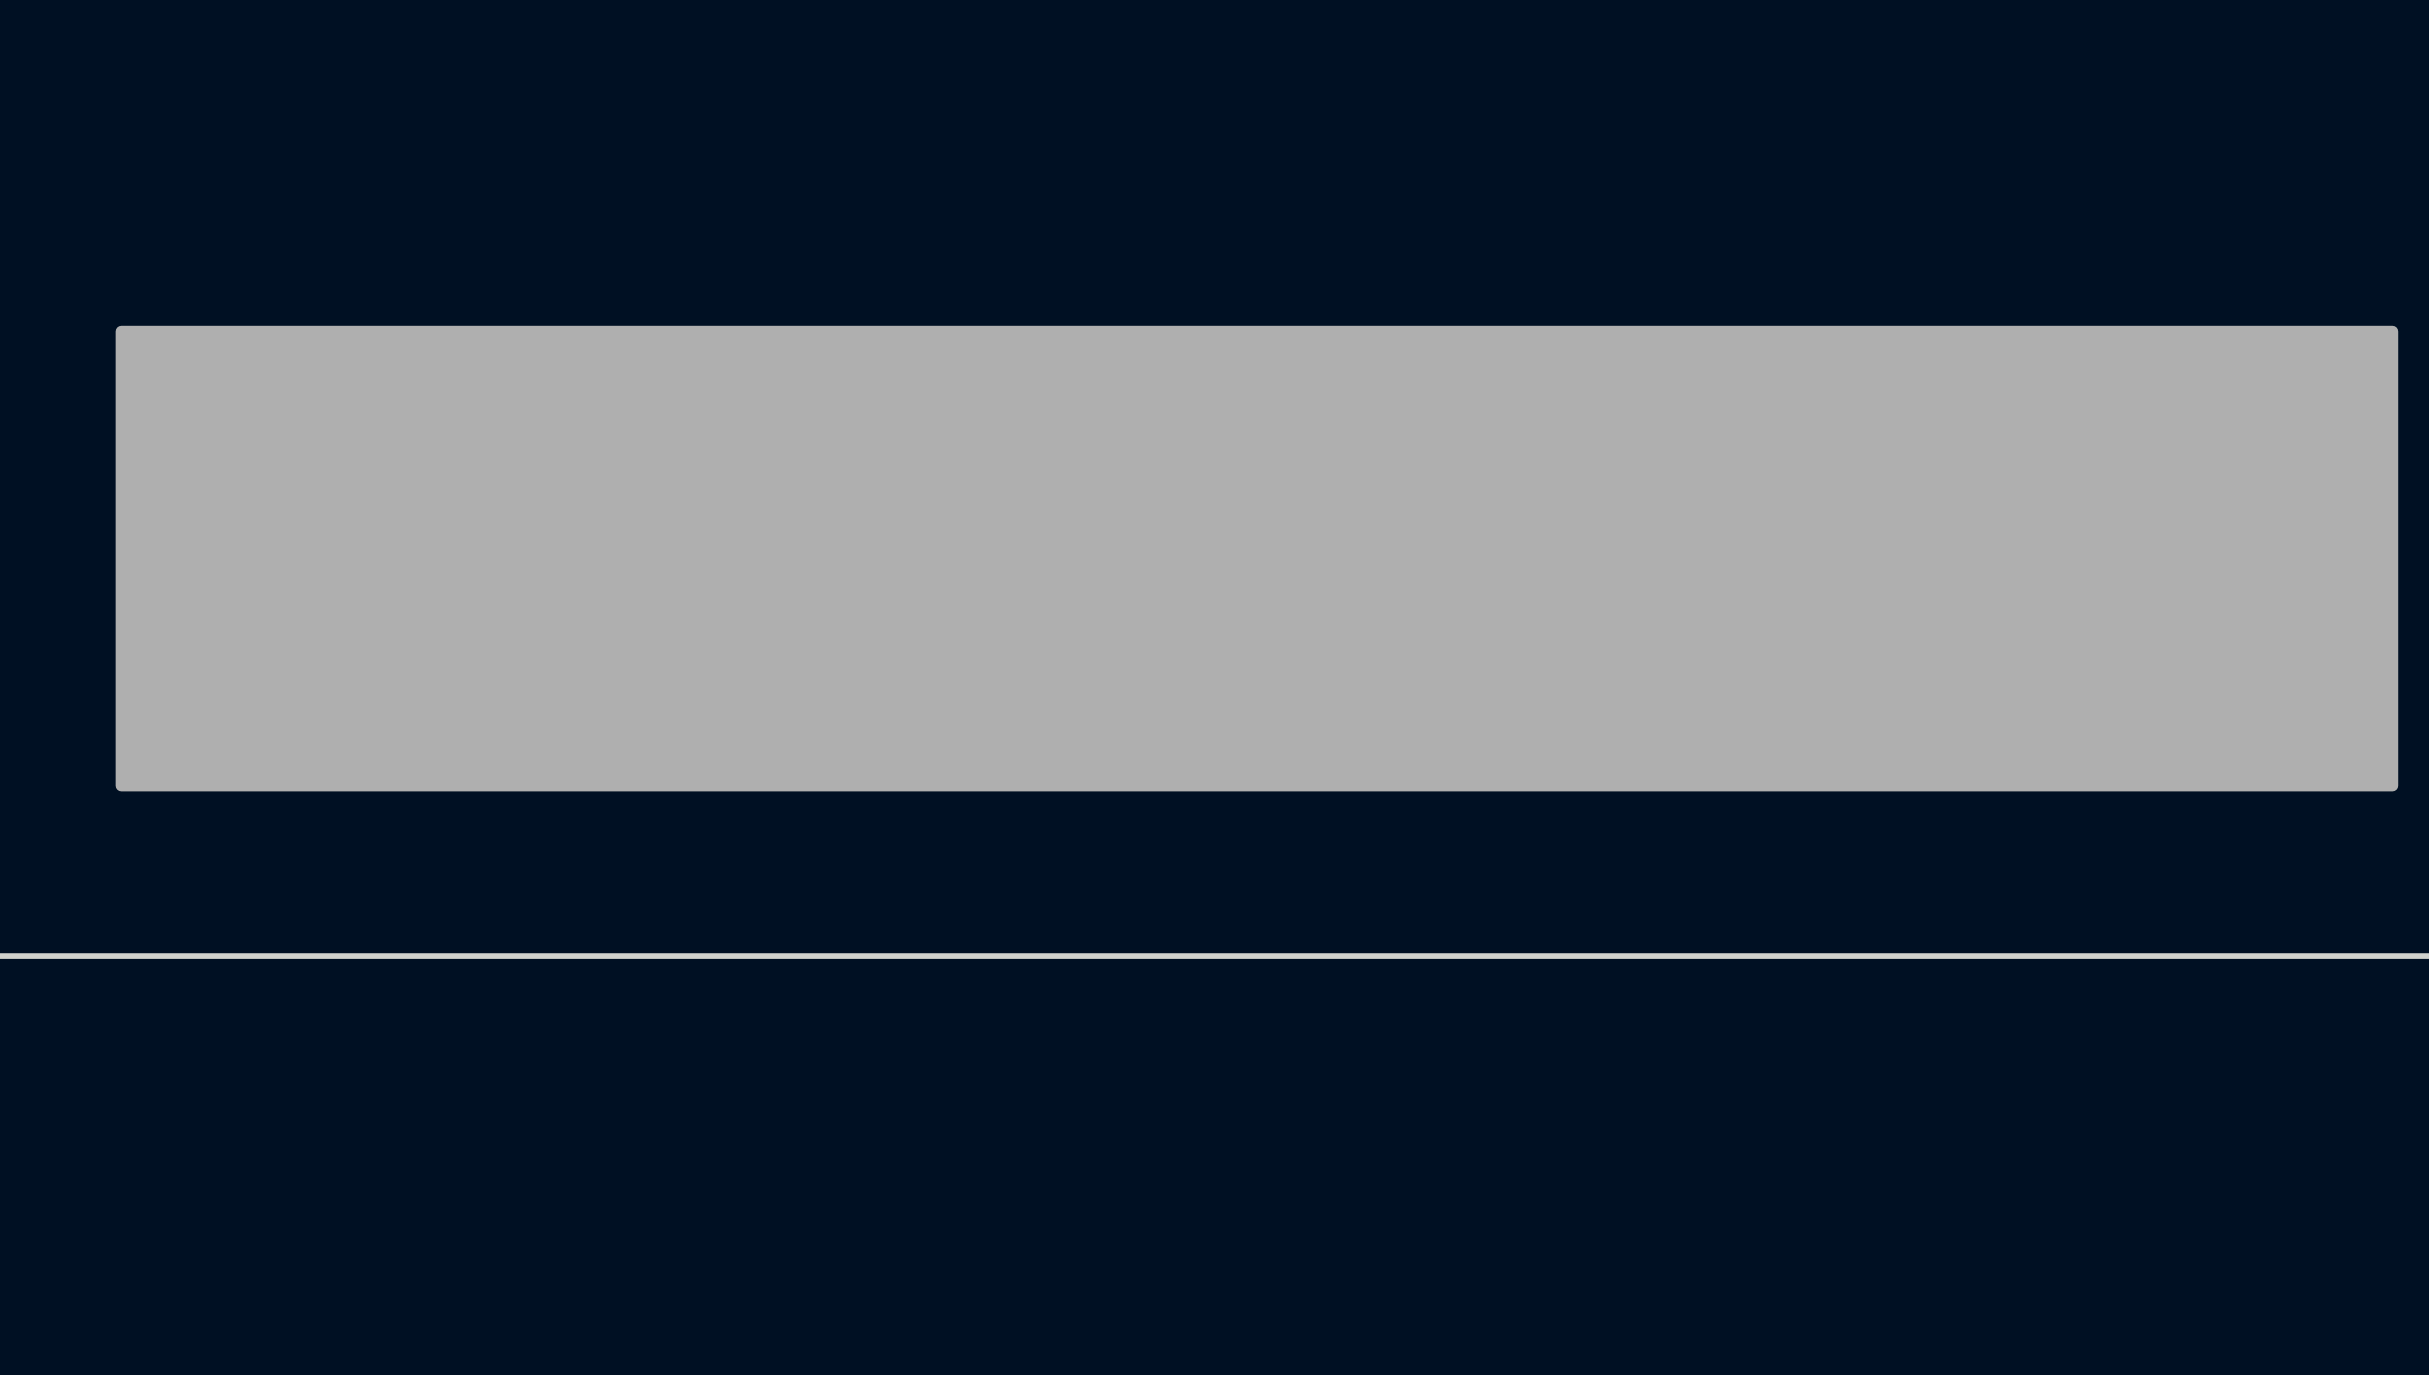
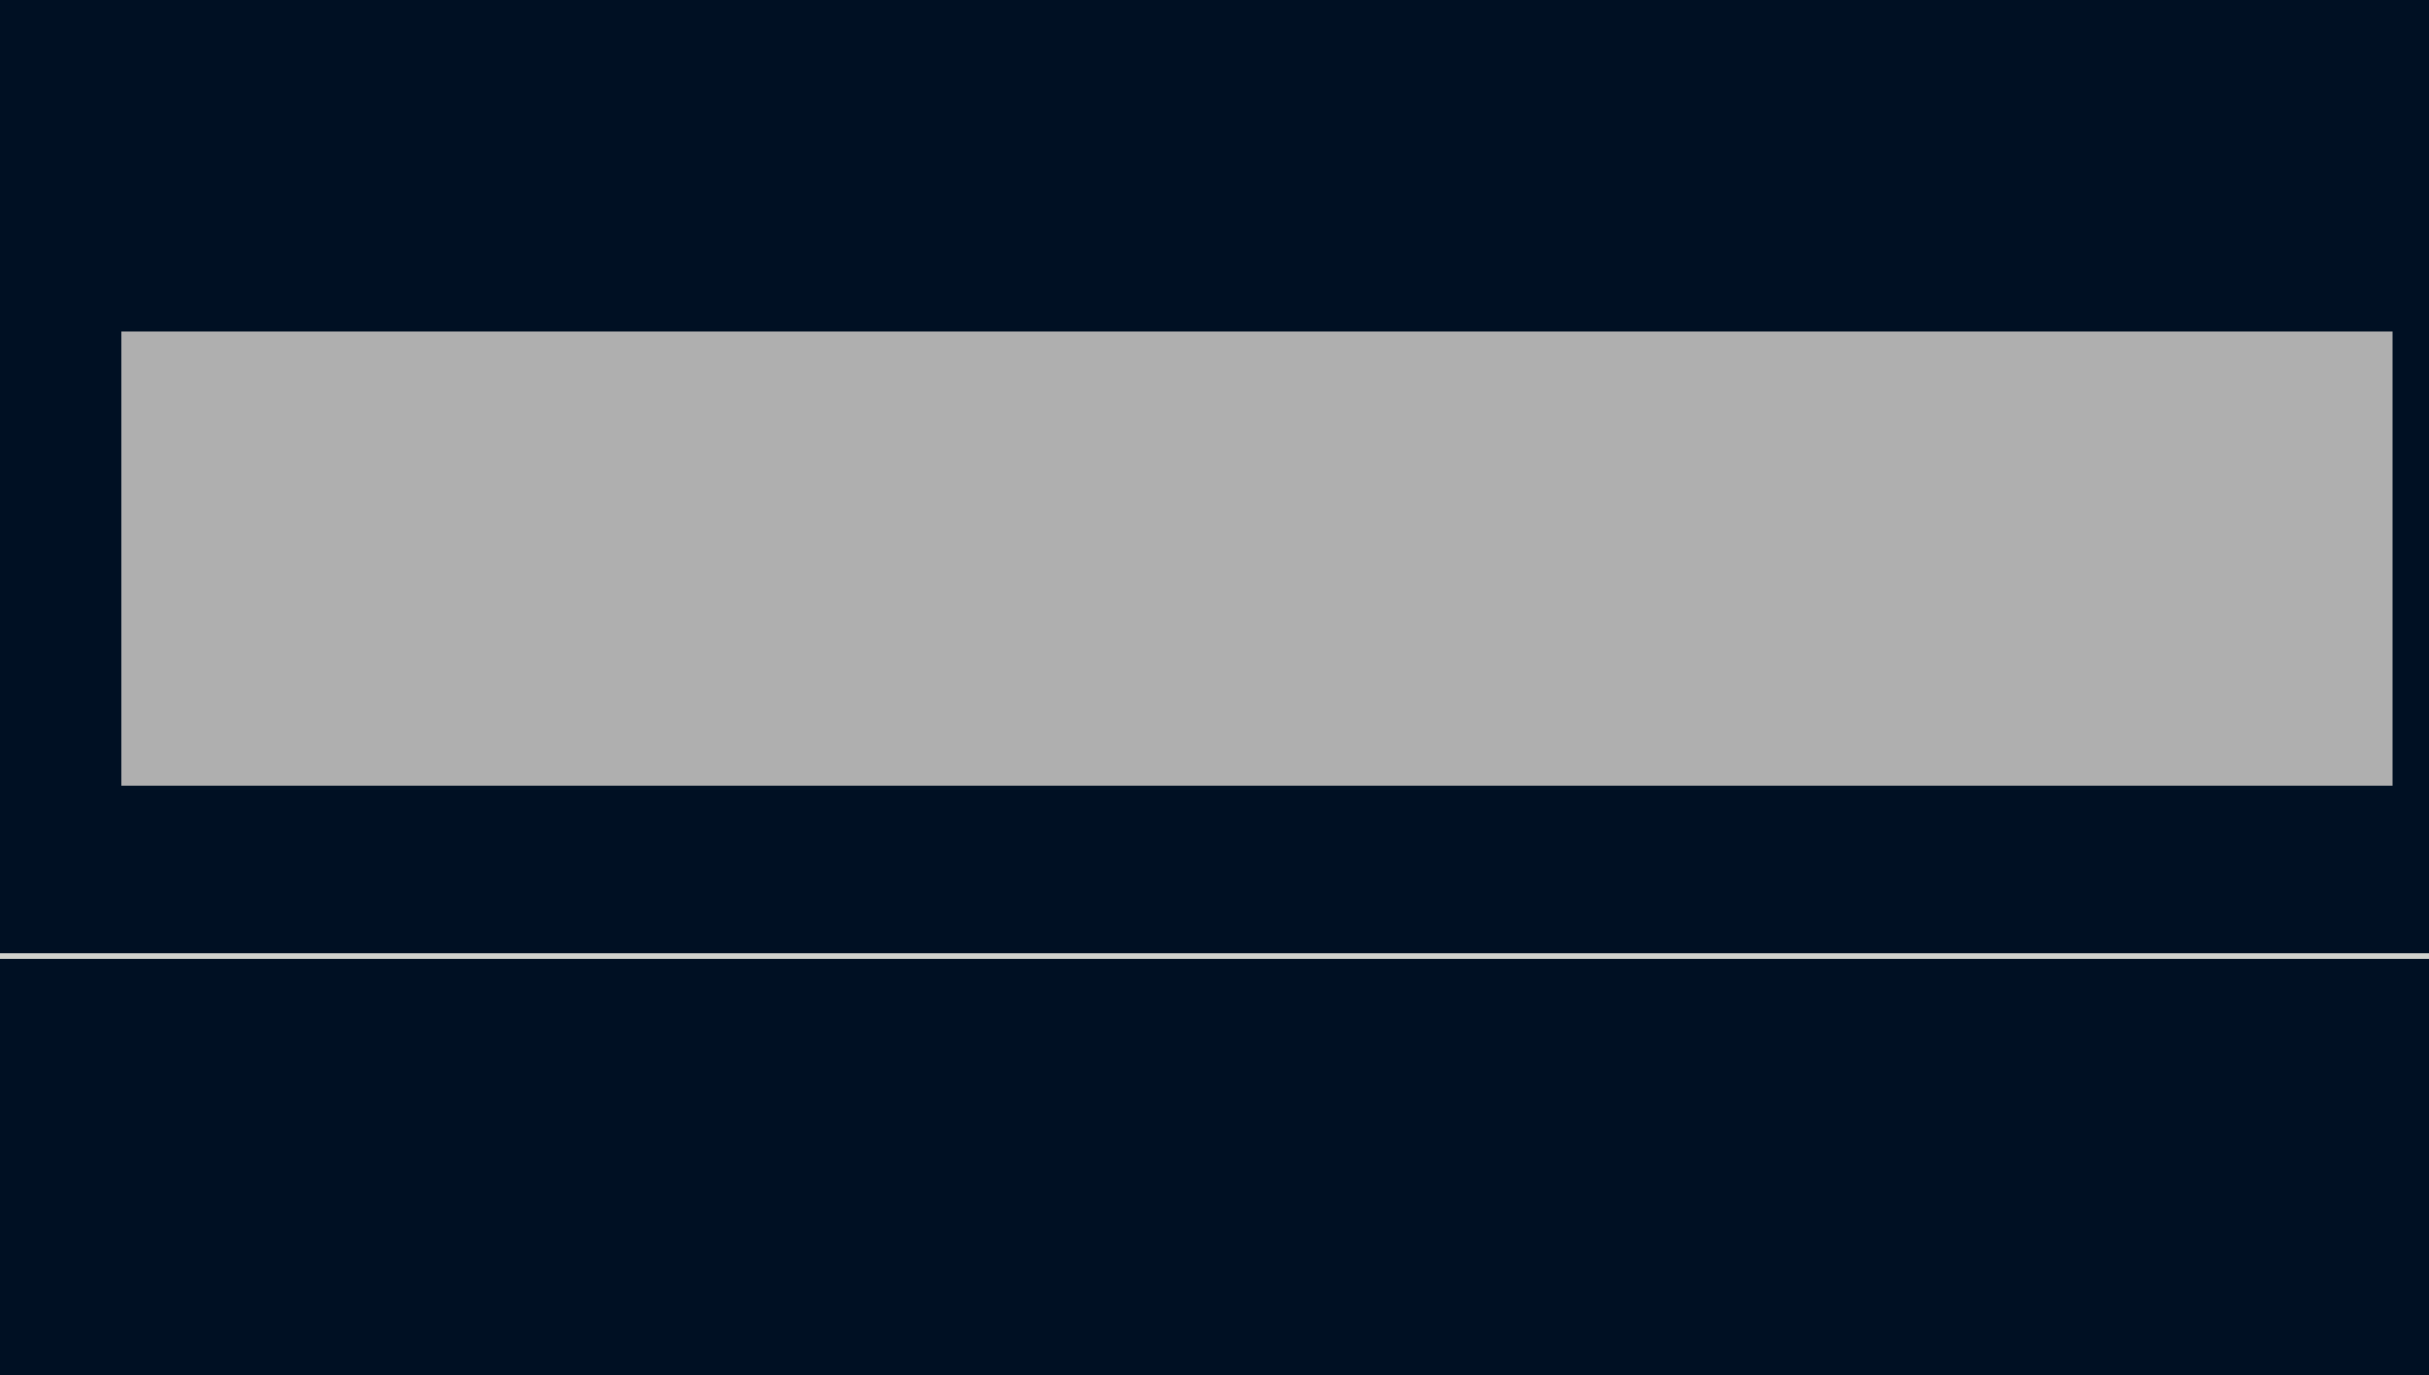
drawing shape: [115, 325, 2399, 792] -> [121, 331, 2393, 786]

